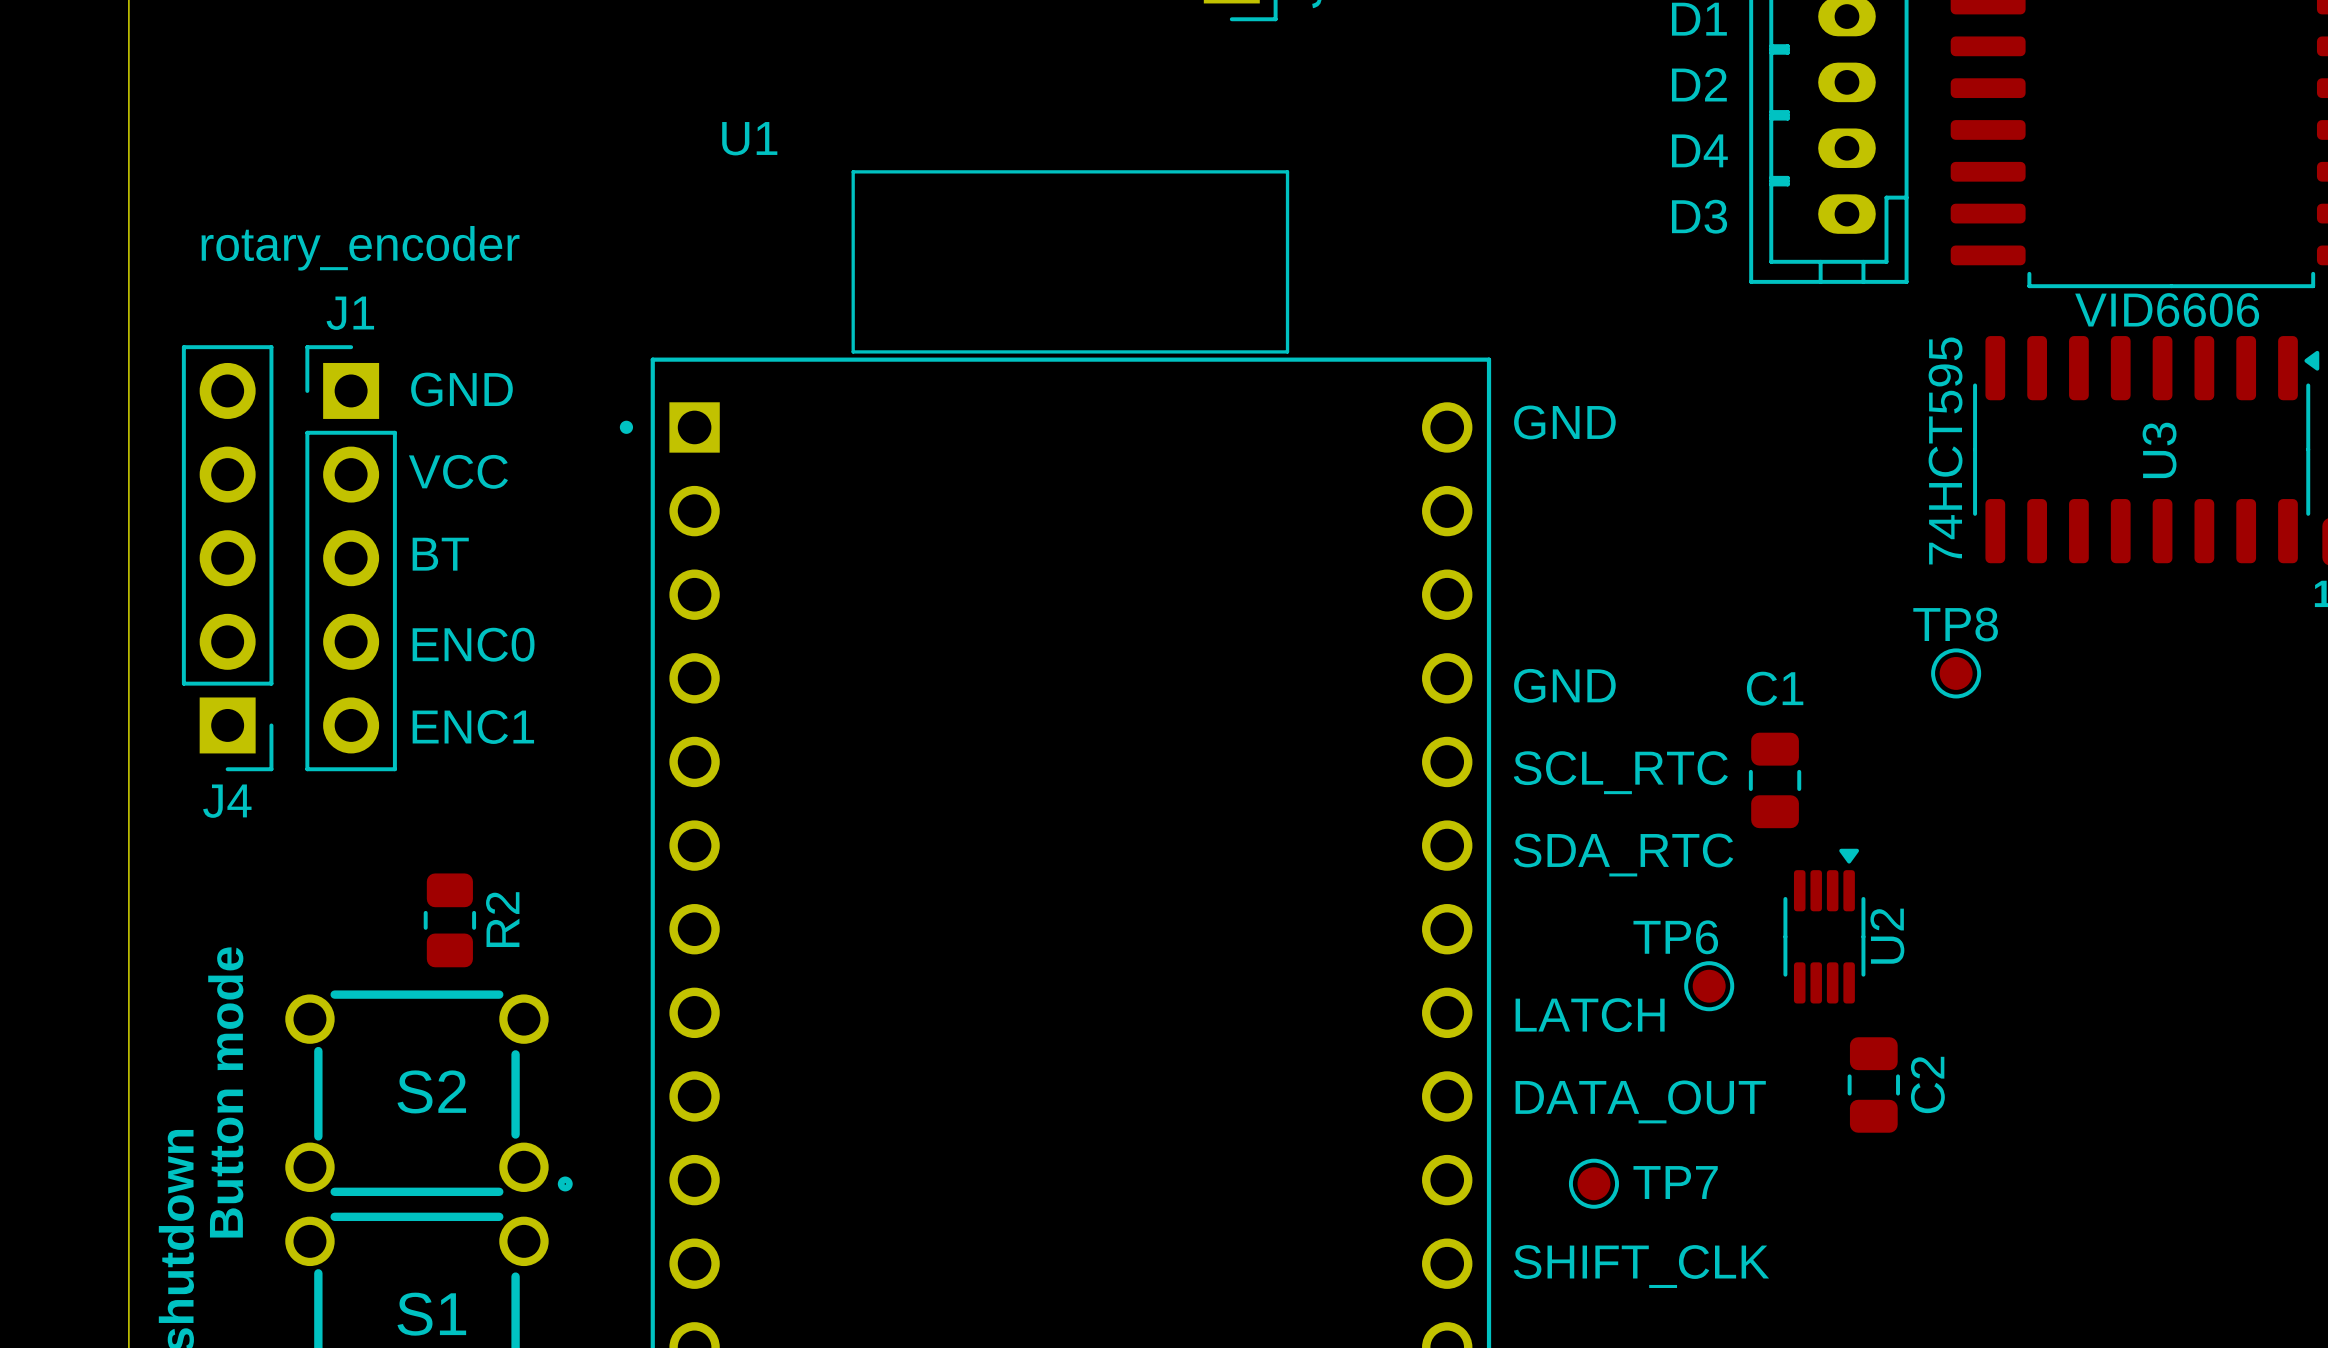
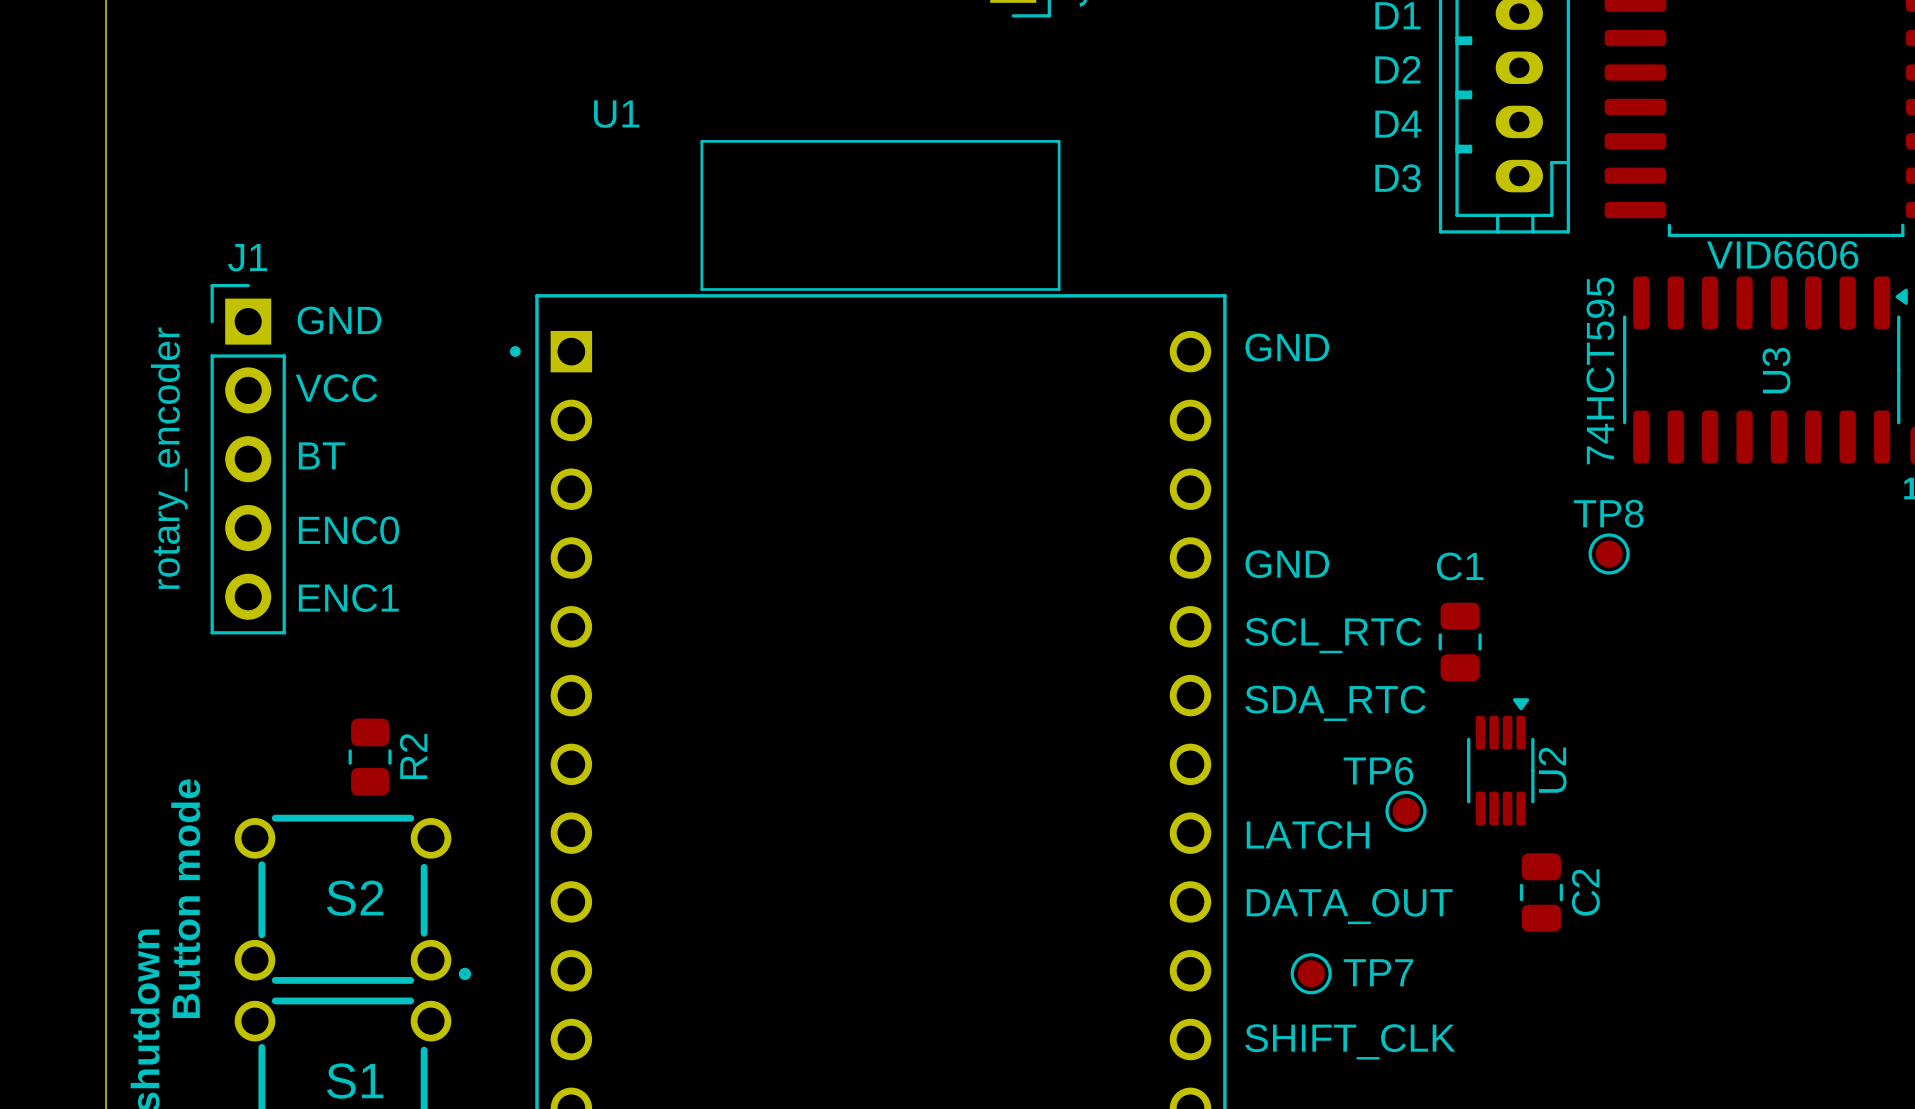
J1 value rotation: 0° (360, 248) -> 90° counterclockwise (169, 458)
text position: GND (461, 389) -> GND (339, 320)
text position: VCC (458, 471) -> VCC (336, 388)
text position: BT (440, 554) -> BT (321, 455)
J4: (227, 558) -> none
J1 position: (351, 558) -> (248, 459)
text position: ENC0 (473, 644) -> ENC0 (348, 530)
text position: ENC1 (473, 727) -> ENC1 (348, 598)

